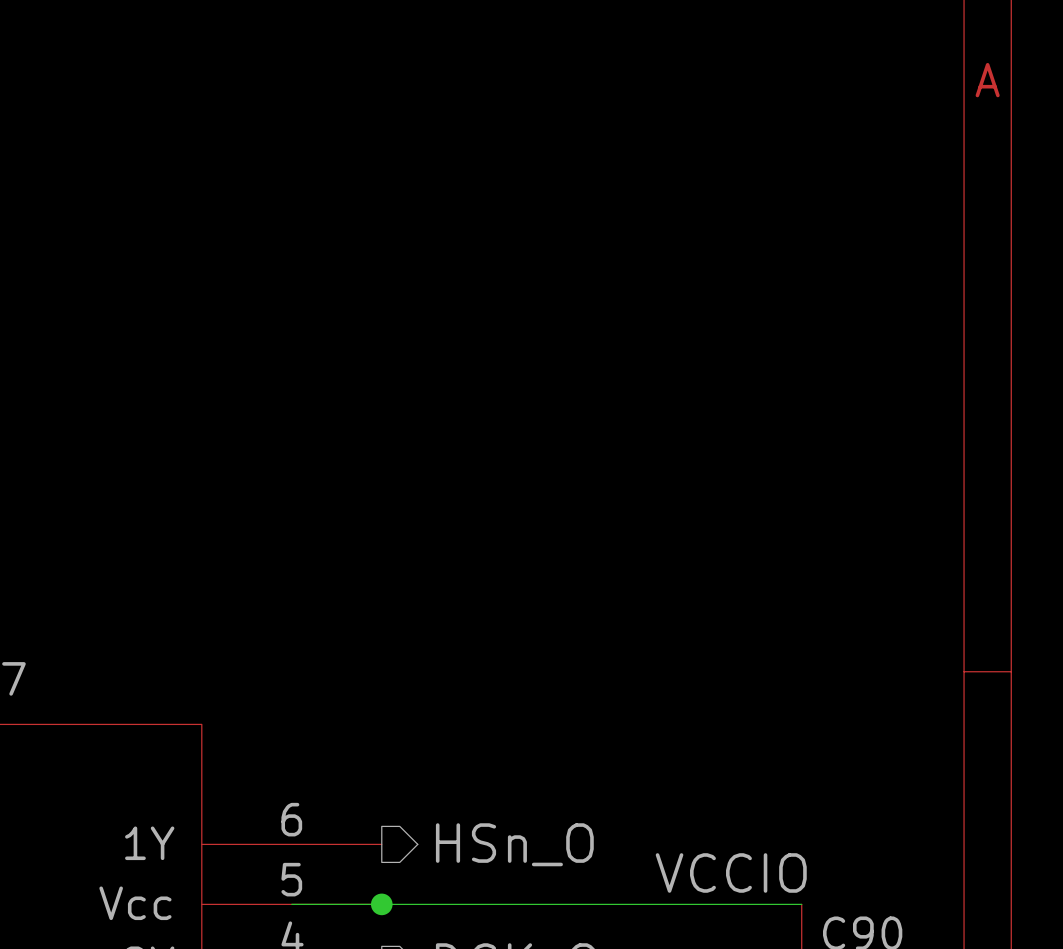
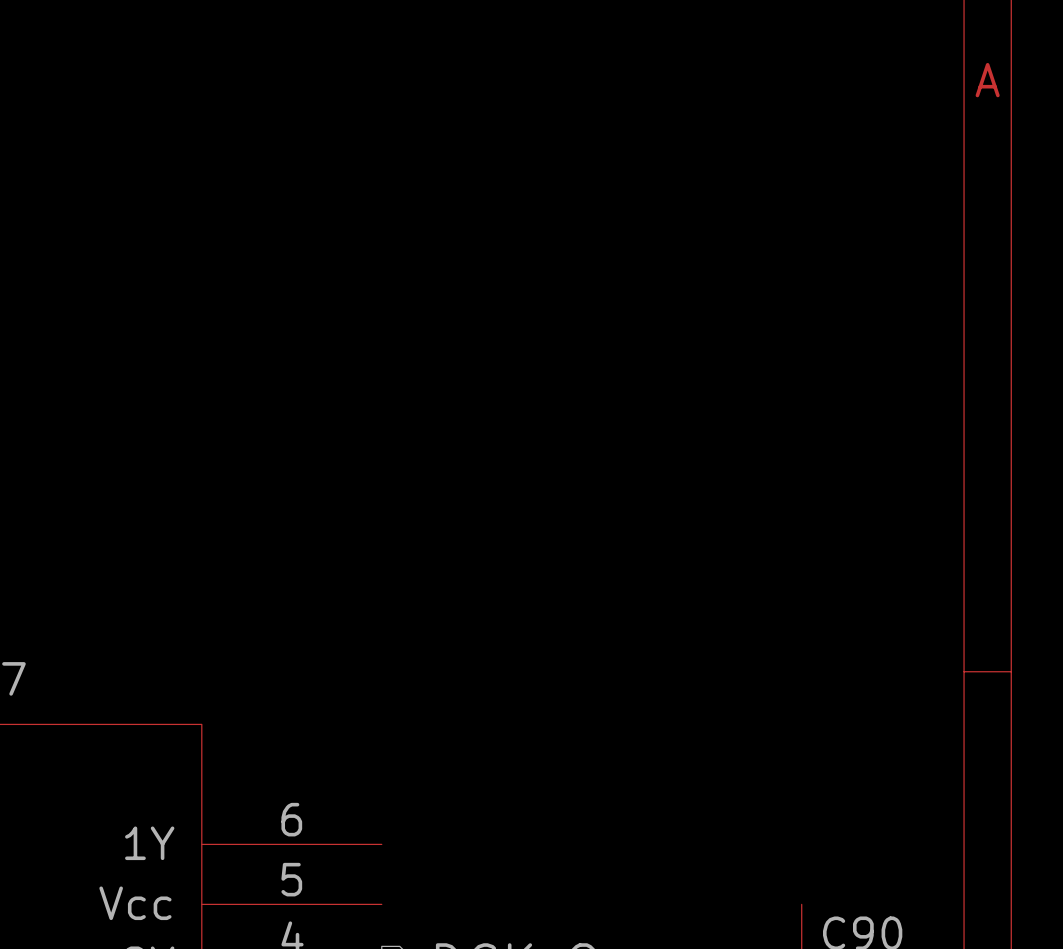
hierarchical label: HSn_O (514, 844) -> none
label: VCCIO (731, 872) -> none
wire: (291, 904) (801, 904) -> none
junction: (381, 904) -> none

